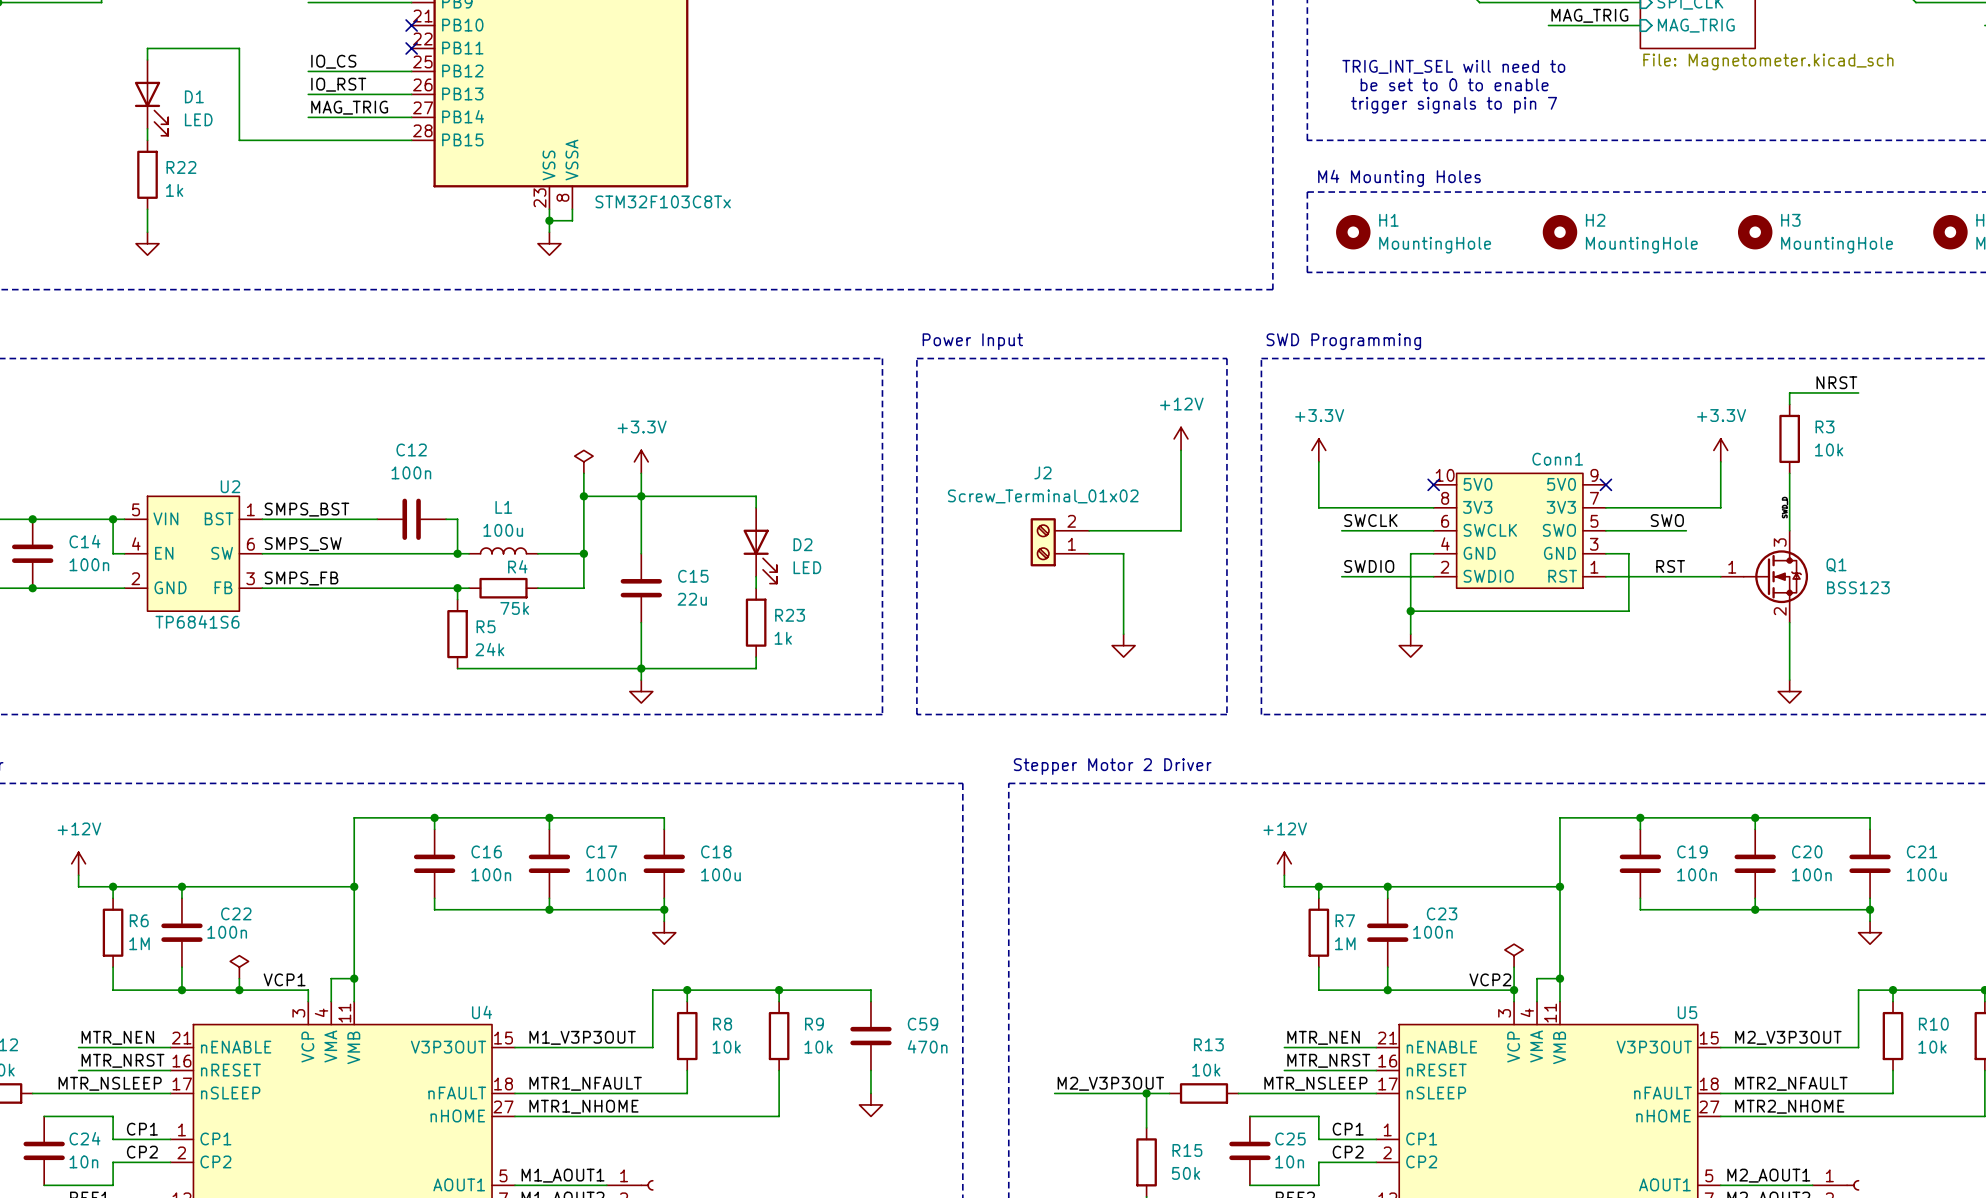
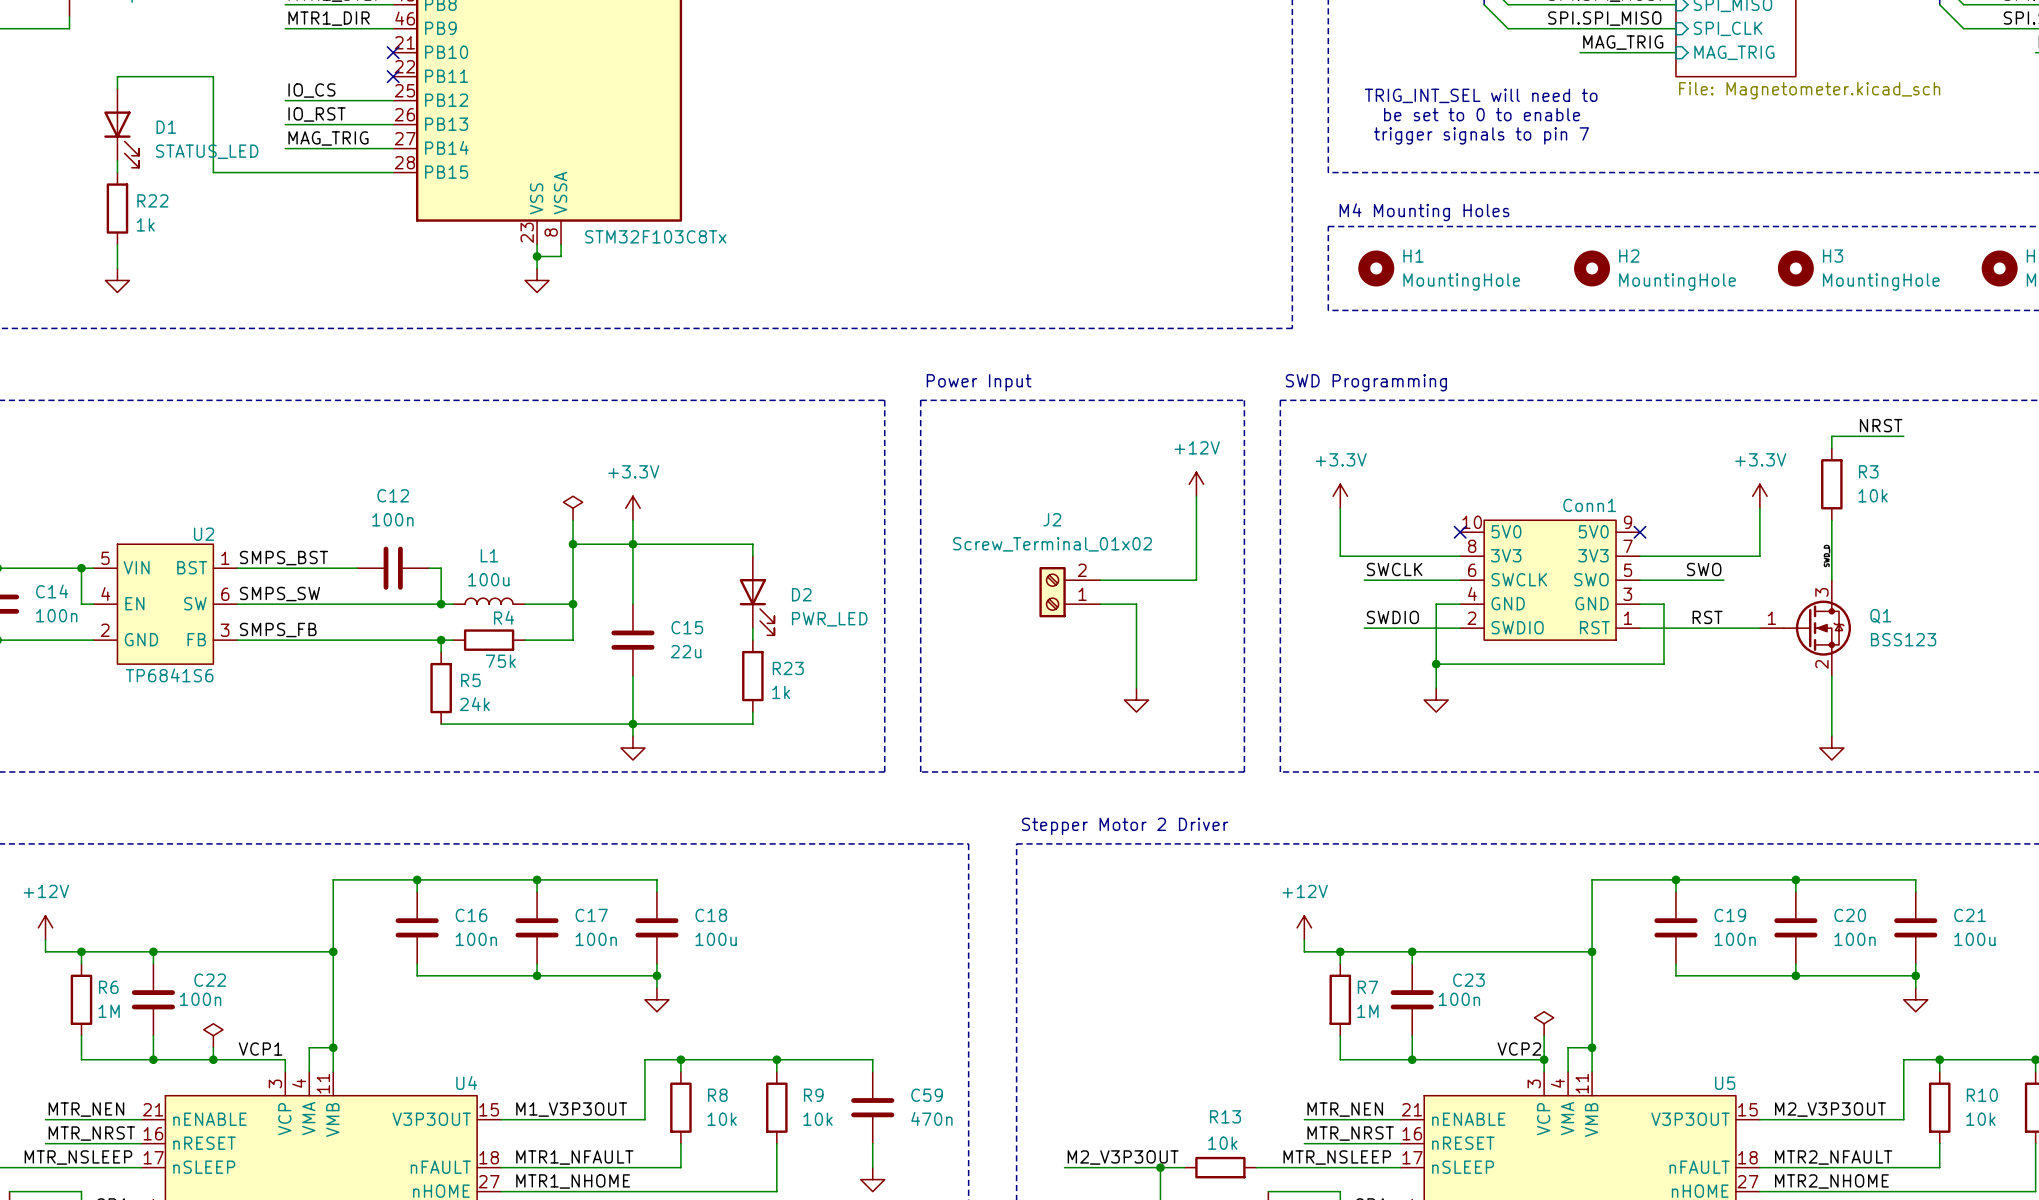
D1 value: LED (198, 119) -> STATUS_LED (207, 151)
D2 value: LED (807, 567) -> PWR_LED (829, 619)

